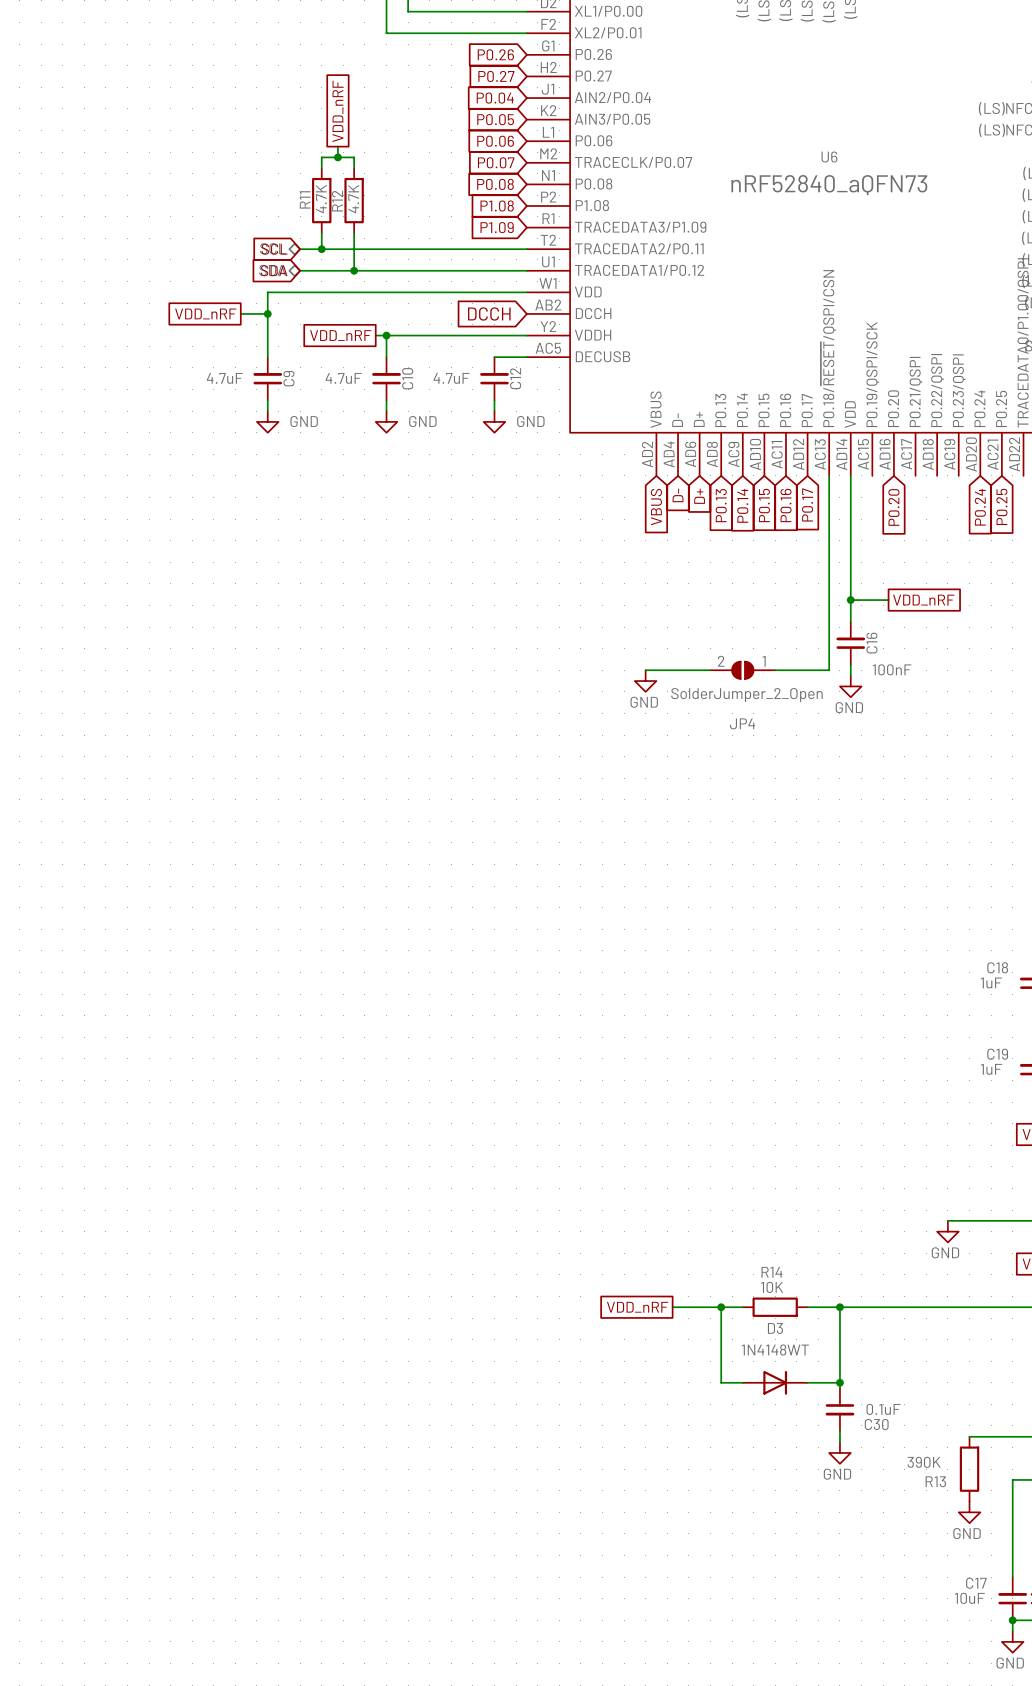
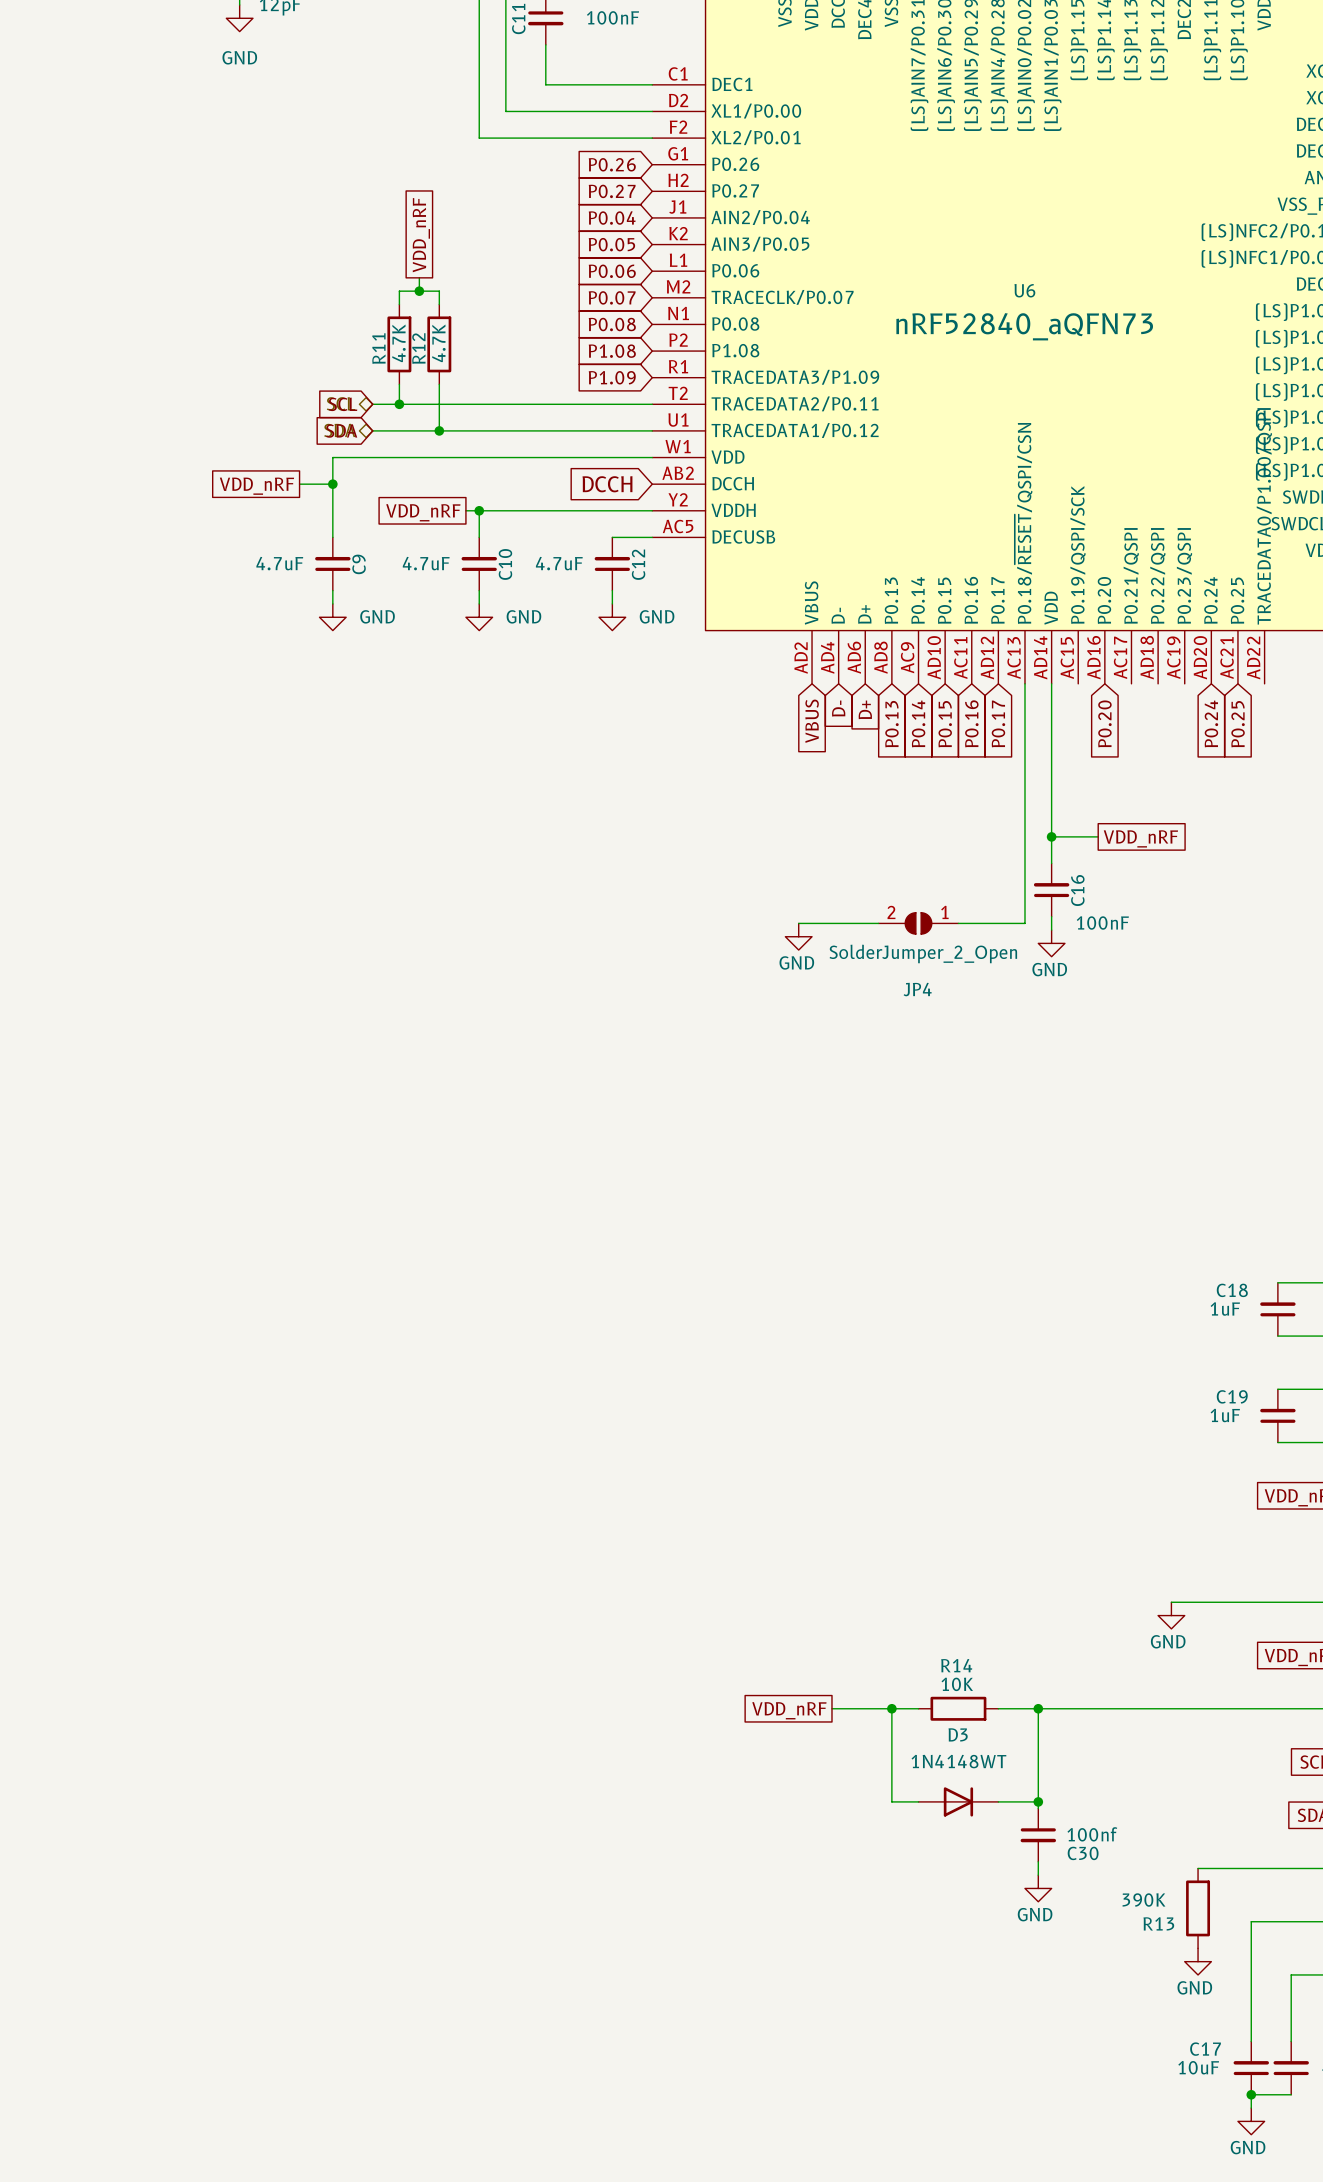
C30 value: 0.1uF (883, 1409) -> 100nf (1092, 1834)

